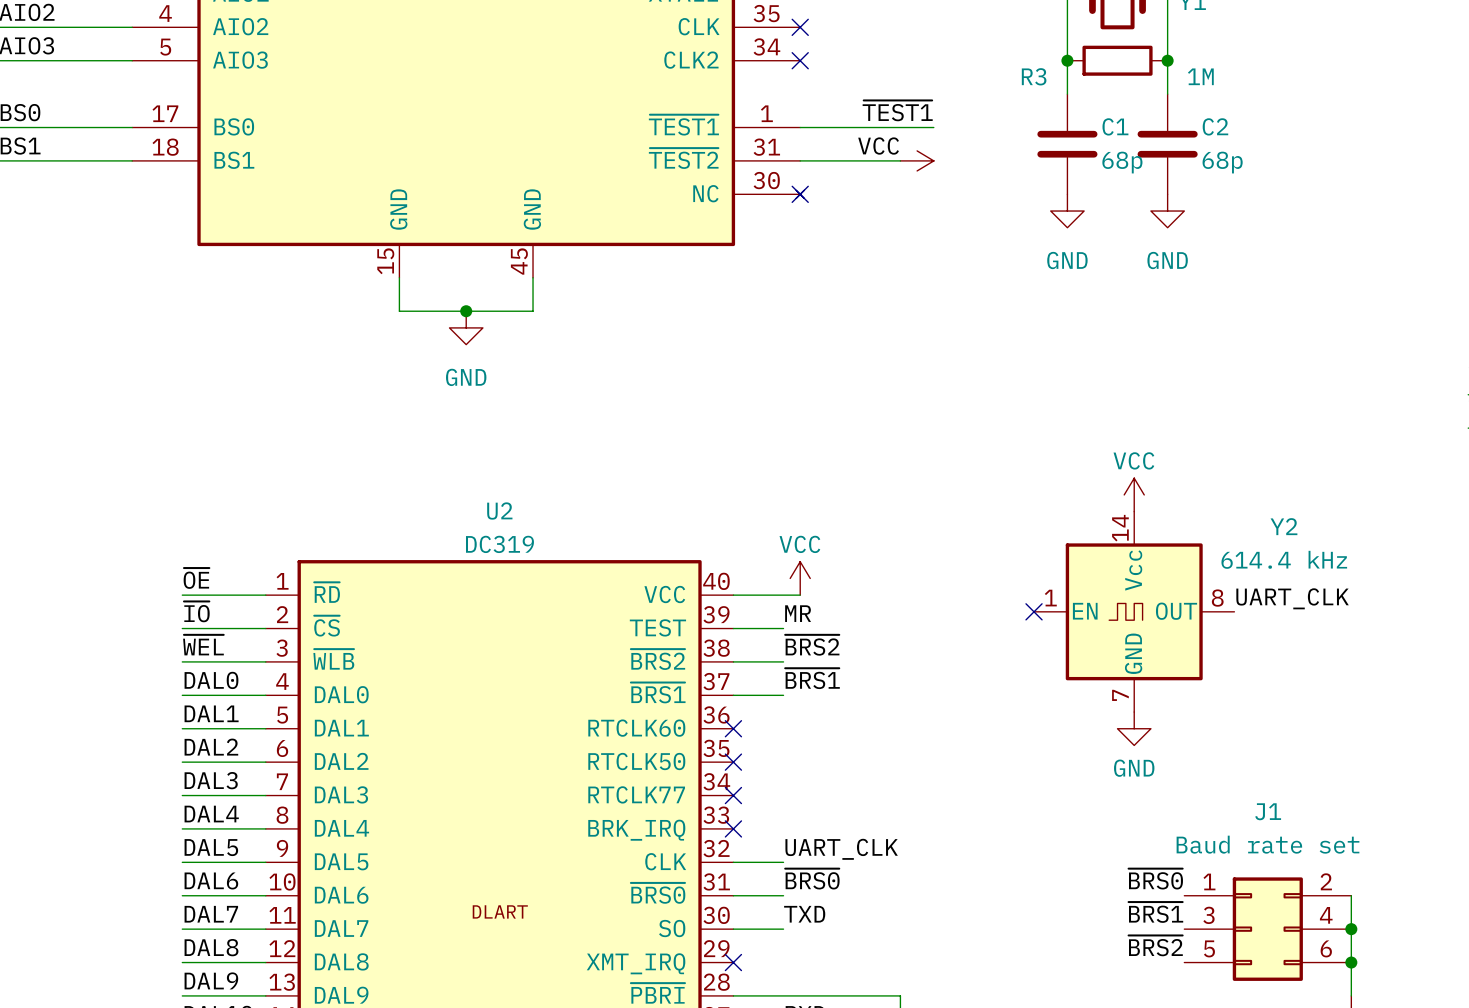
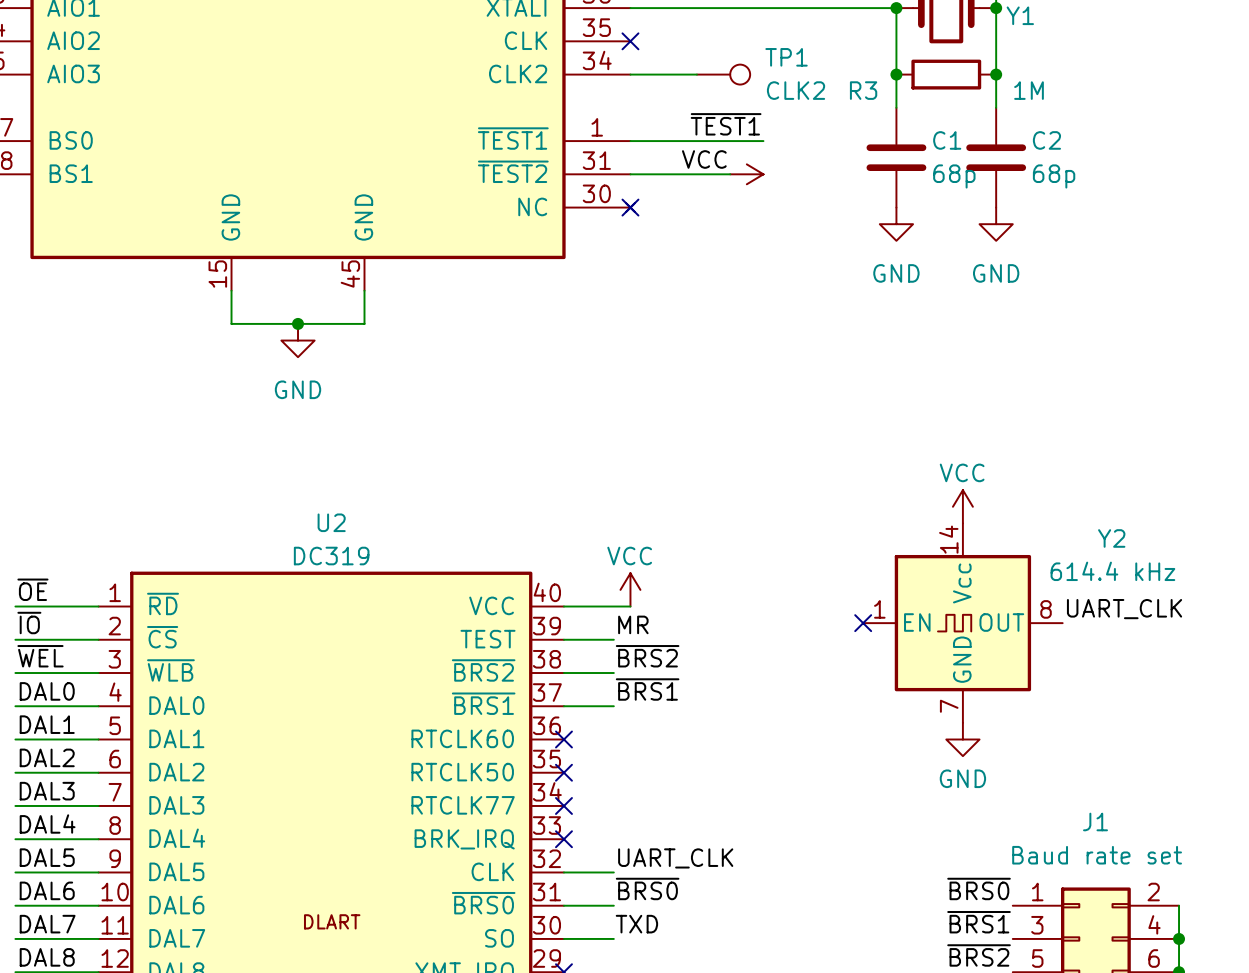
wire: none -> (630, 74) (696, 74)
no-connect mark: (800, 60) -> none
TP1: none -> CLK2 (723, 74)

